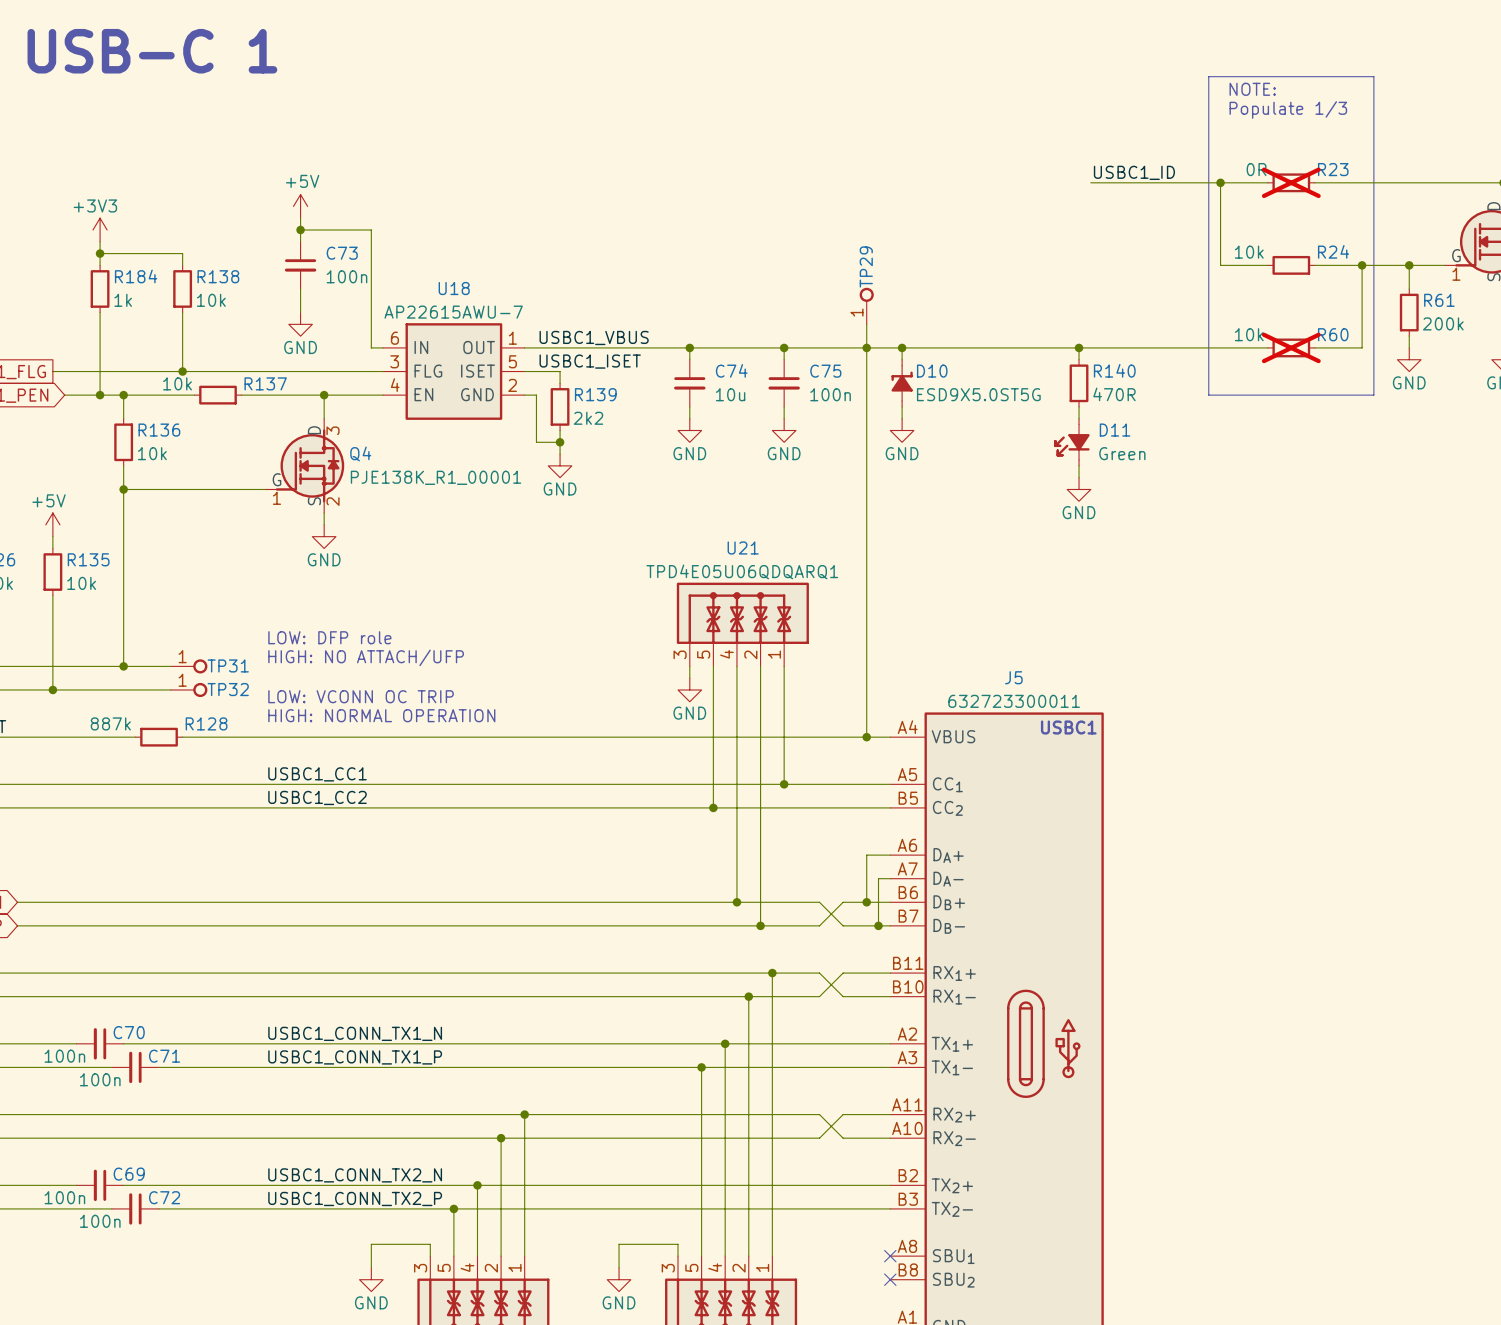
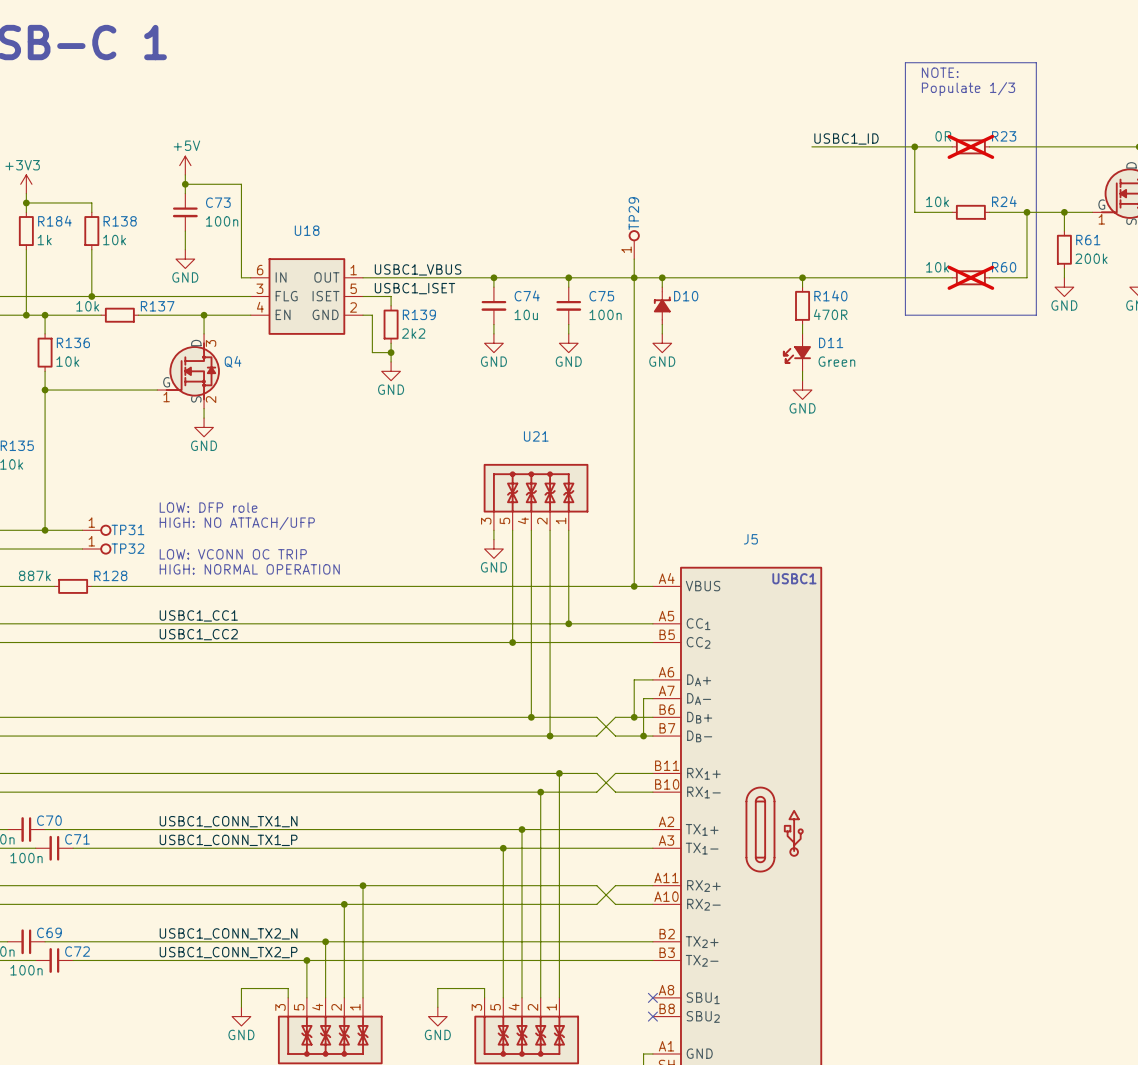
U18 text: AP22615AWU-7 (453, 312) -> none
D10 text: ESD9X5.0ST5G (978, 394) -> none
Q4 text: PJE138K_R1_00001 (436, 477) -> none
U21 text: TPD4E05U06QDQARQ1 (742, 571) -> none
J5 text: 632723300011 (1014, 701) -> none

